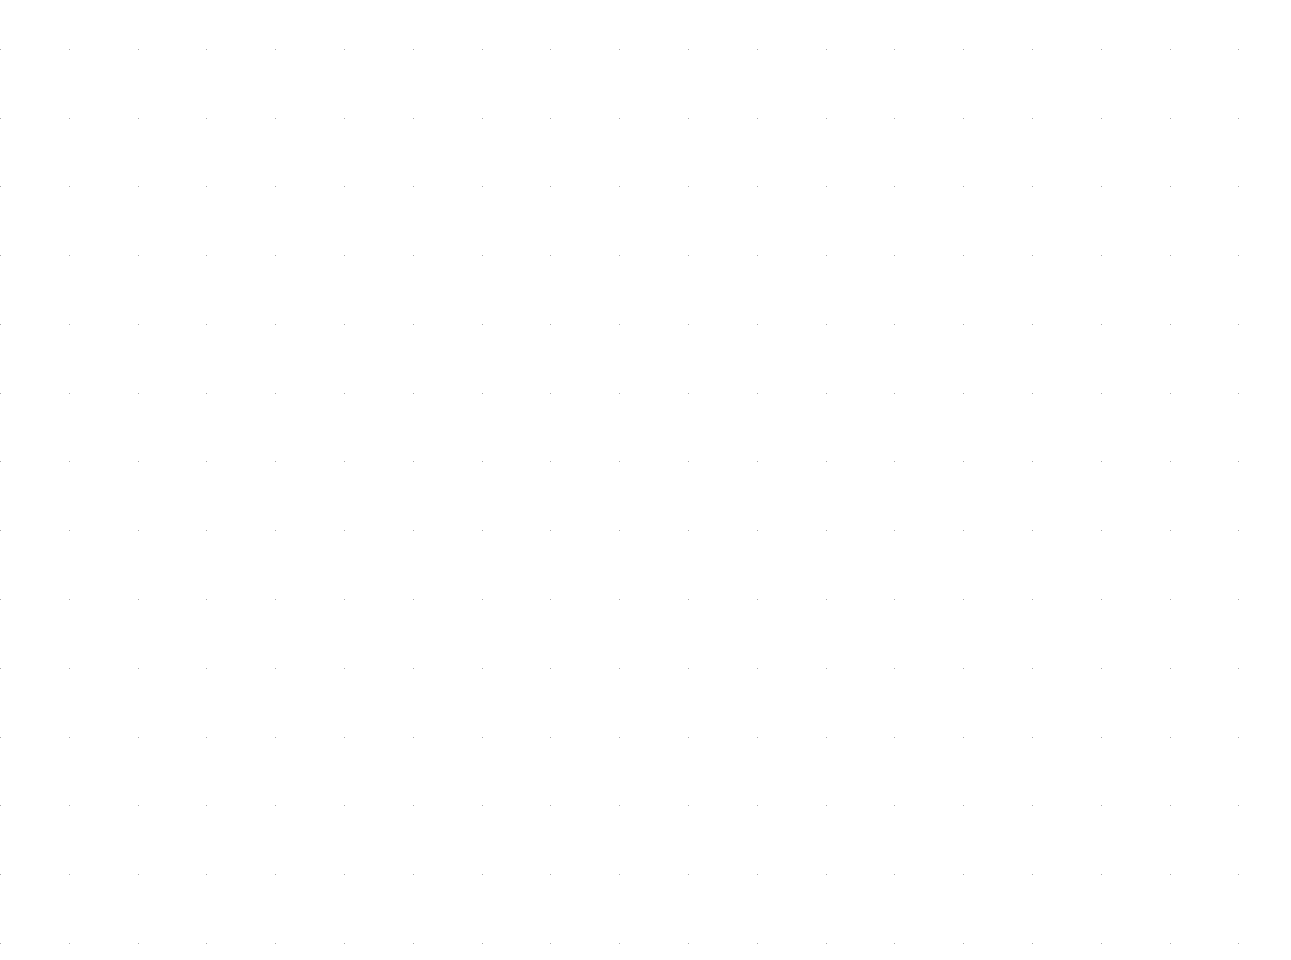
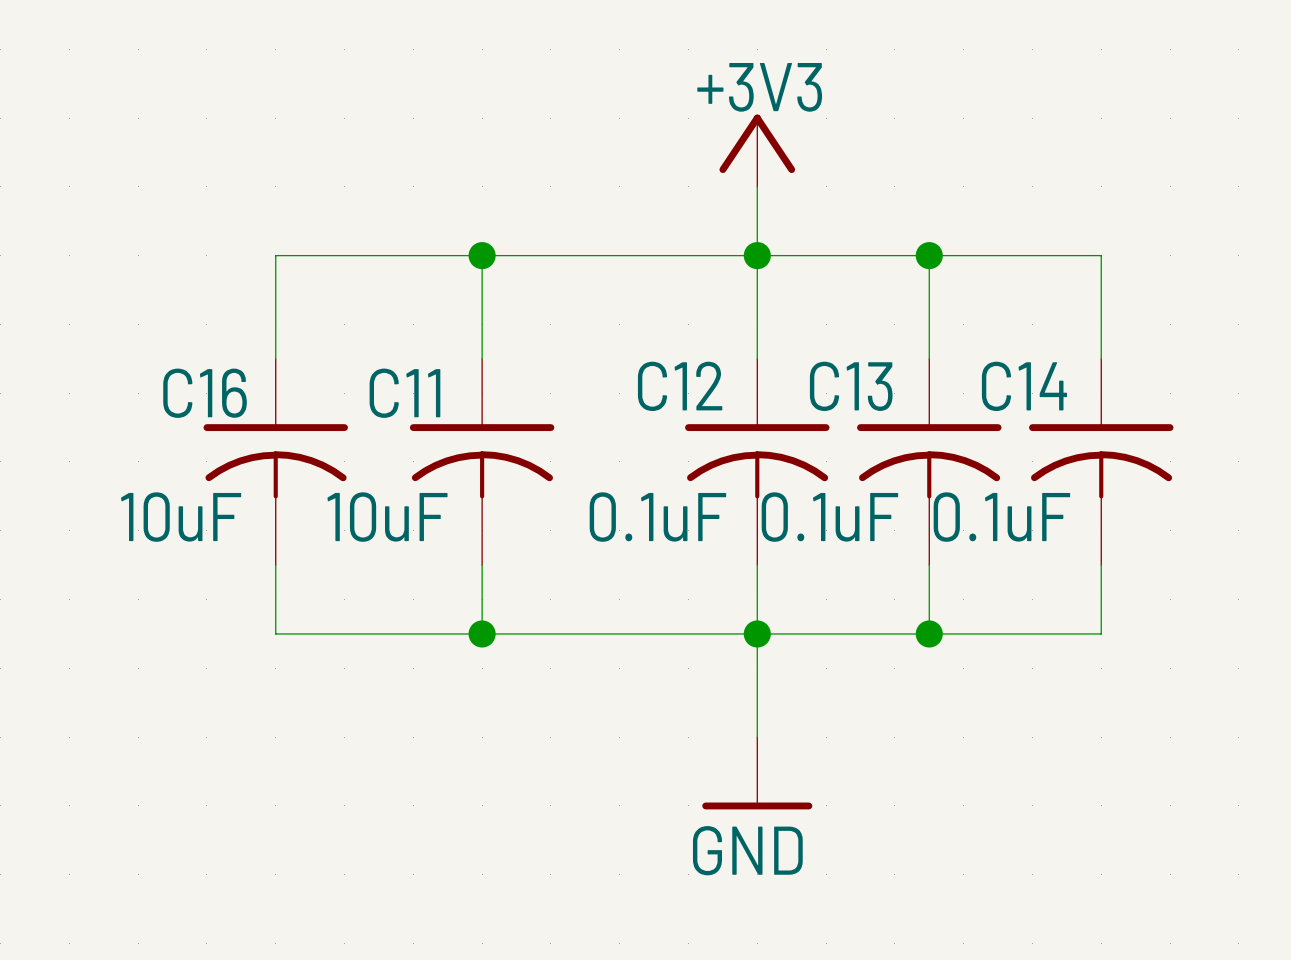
power symbol: none -> +3V3 (757, 150)
wire: none -> (757, 186) (757, 358)
wire: none -> (482, 255) (482, 358)
junction: none -> (482, 255)
junction: none -> (757, 255)
wire: none -> (929, 255) (929, 358)
junction: none -> (929, 255)
wire: none -> (275, 358) (275, 255) (1101, 255) (1101, 358)
C16: none -> 10uF (275, 461)
C11: none -> 10uF (482, 461)
C12: none -> 0.1uF (757, 461)
C13: none -> 0.1uF (929, 461)
C14: none -> 0.1uF (1101, 461)
wire: none -> (275, 565) (275, 633) (1101, 633) (1101, 565)
wire: none -> (482, 565) (482, 633)
wire: none -> (757, 565) (757, 737)
wire: none -> (929, 565) (929, 633)
junction: none -> (482, 633)
junction: none -> (757, 633)
junction: none -> (929, 633)
power symbol: none -> GND (757, 773)

